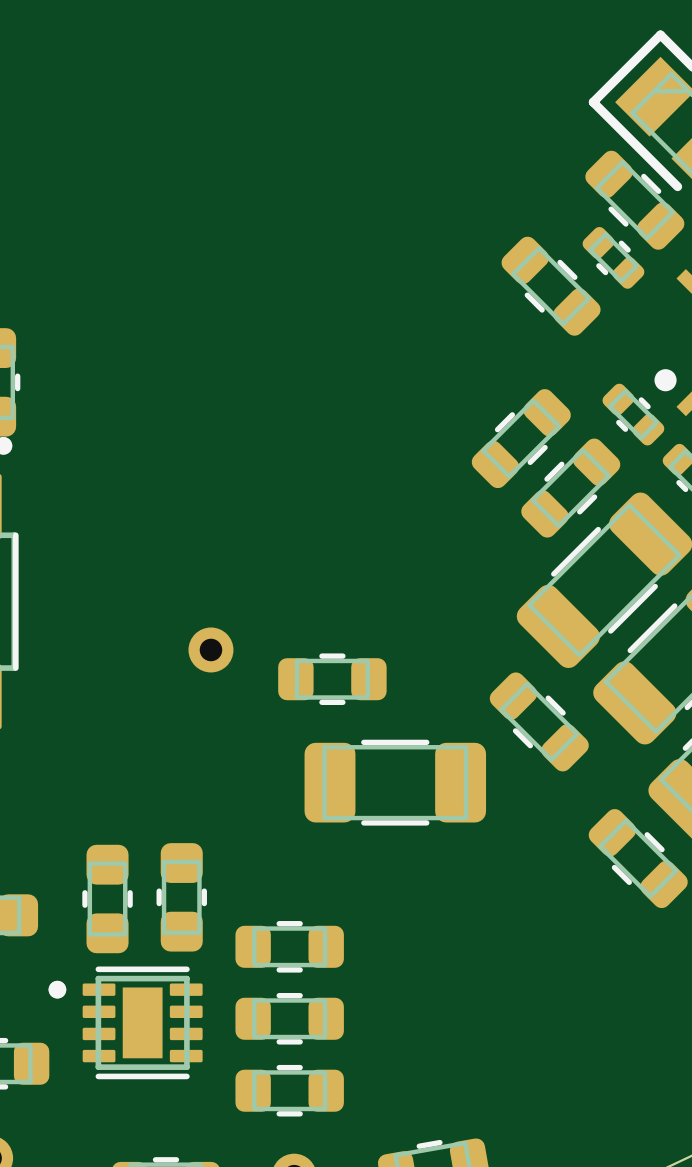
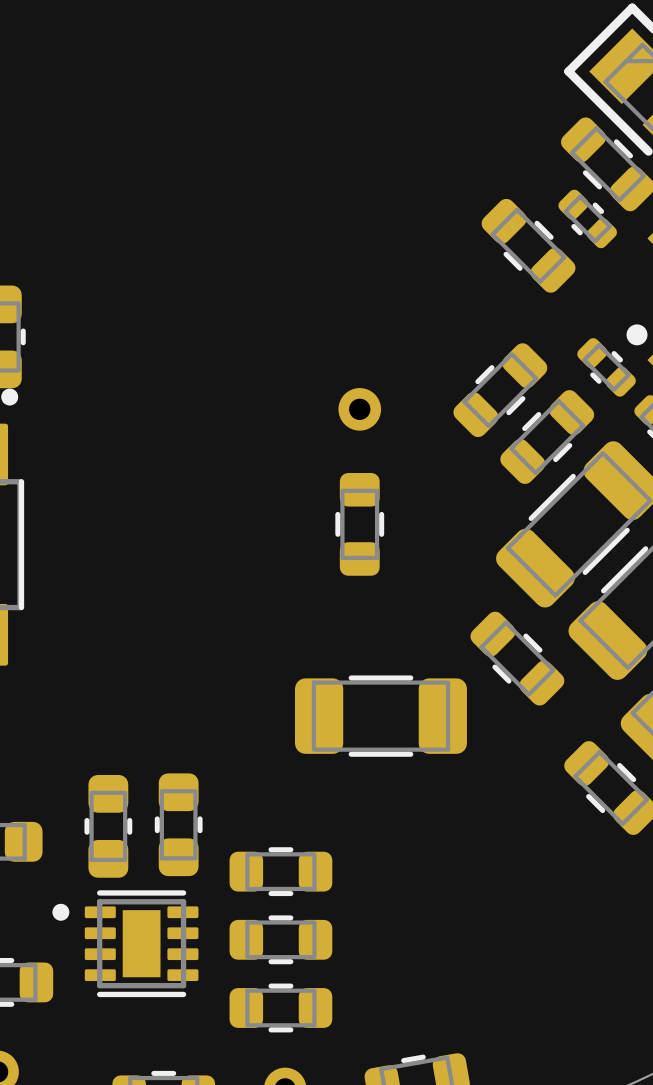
part position: (210, 649) -> (359, 409)
part rotation: 0° (332, 679) -> 90° clockwise (359, 524)
part position: (332, 679) -> (359, 524)

